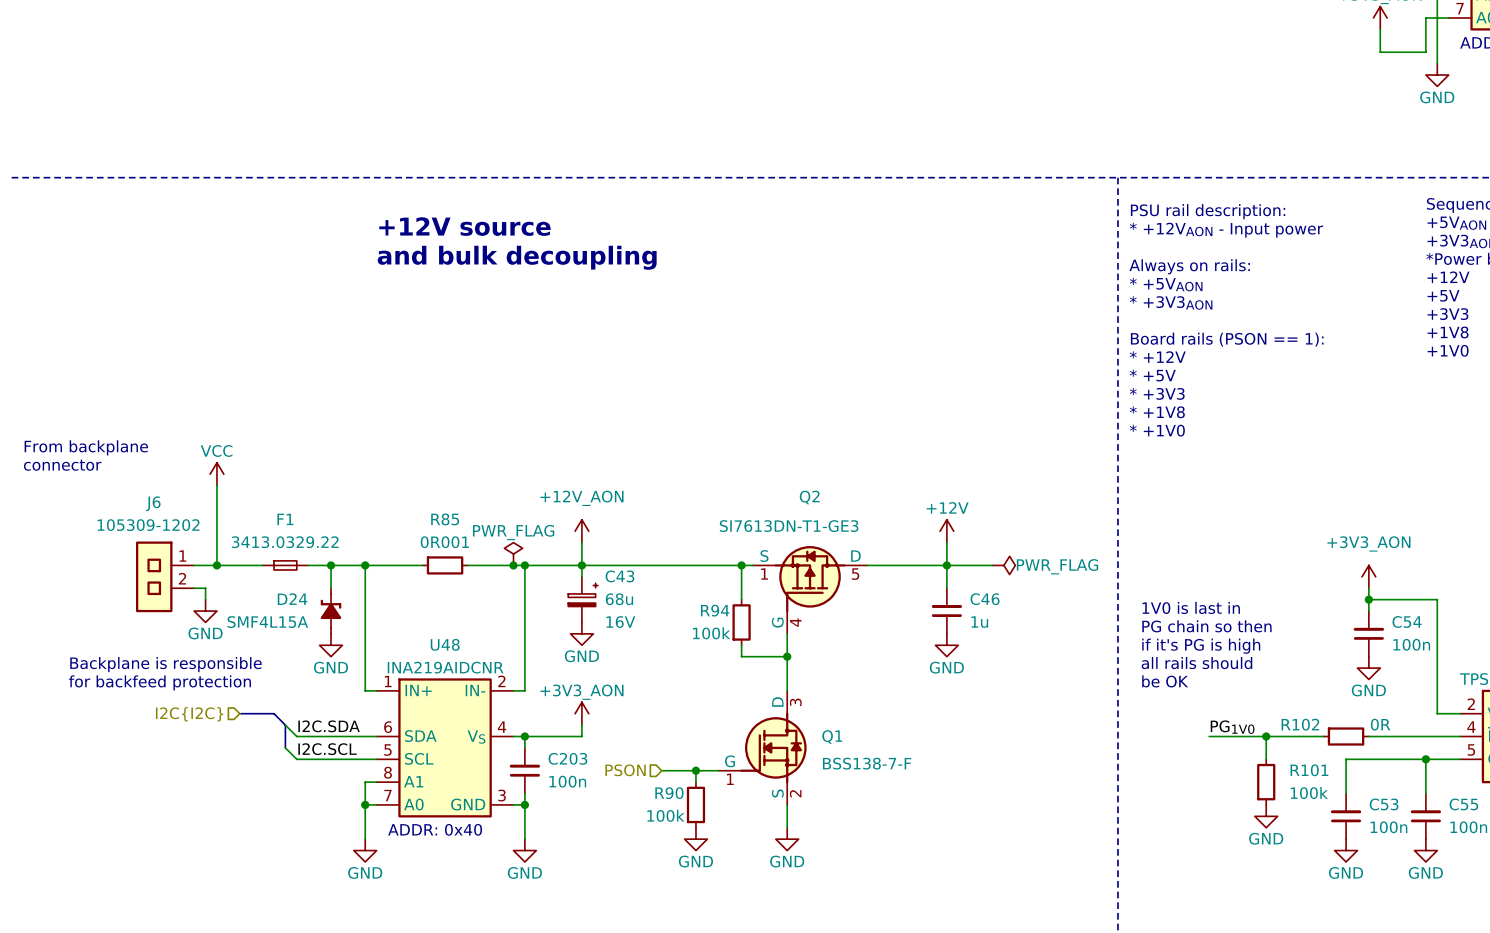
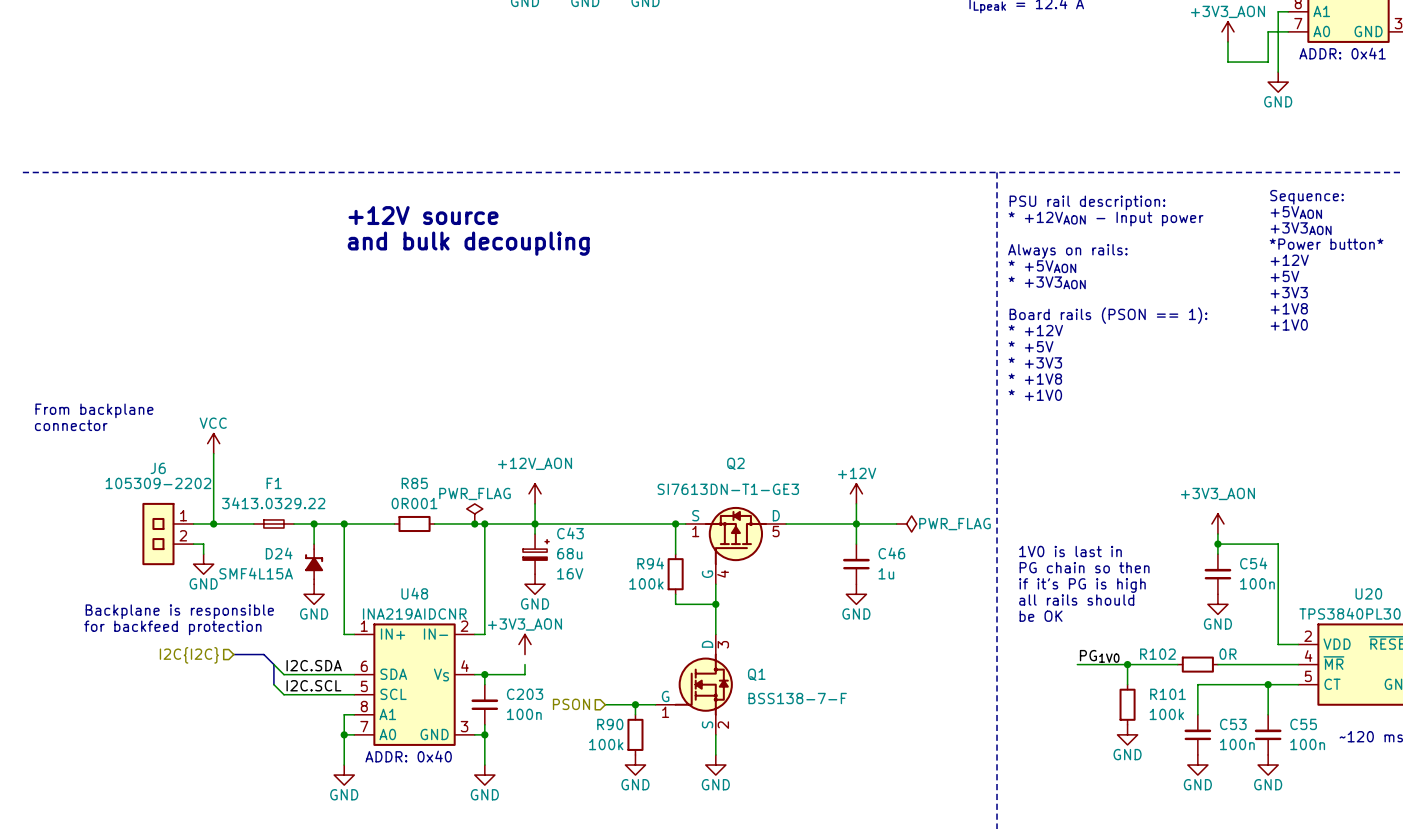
power symbol position: VCC (216, 474) -> VCC (213, 443)
wire: (216, 485) (216, 565) -> (213, 453) (213, 523)
J6 text: 105309-1202 (148, 525) -> 105309-2202 (158, 483)
power symbol position: +12V_AON (581, 531) -> +12V_AON (535, 493)
power symbol position: +12V (946, 531) -> +12V (856, 493)
wire: (581, 542) (581, 576) -> (535, 503) (535, 534)
wire: (946, 542) (946, 588) -> (856, 503) (856, 544)
power symbol position: PWR_FLAG (513, 554) -> PWR_FLAG (474, 513)
wire: (194, 565) (262, 565) -> (193, 523) (253, 523)
junction position: (216, 565) -> (213, 523)
F1 position: (285, 565) -> (273, 523)
wire: (308, 565) (422, 565) -> (294, 523) (394, 523)
wire: (331, 565) (331, 588) -> (314, 523) (314, 544)
junction: (331, 565) -> none
wire: (365, 565) (365, 690) (376, 690) -> (344, 523) (344, 634) (354, 634)
junction: (365, 565) -> none
R85 position: (445, 565) -> (414, 523)
wire: (467, 565) (753, 565) -> (434, 523) (685, 523)
junction: (513, 565) -> none
wire: (524, 565) (524, 690) (513, 690) -> (484, 523) (484, 634) (474, 634)
junction: (524, 565) -> none
junction position: (581, 565) -> (535, 523)
wire: (741, 565) (741, 599) -> (675, 523) (675, 554)
junction position: (741, 565) -> (675, 523)
wire: (867, 565) (992, 565) -> (786, 523) (896, 523)
junction position: (946, 565) -> (856, 523)
power symbol position: PWR_FLAG (1003, 565) -> PWR_FLAG (906, 523)
J6 position: (165, 576) -> (167, 534)
junction: none -> (314, 523)
junction: none -> (344, 523)
junction: none -> (474, 523)
junction: none -> (484, 523)
wire: (194, 588) (205, 588) (205, 599) -> (203, 554) (203, 544) (193, 544)
Q2 position: (810, 589) -> (735, 545)
C43 position: (583, 599) -> (536, 554)
power symbol position: GND (205, 611) -> GND (203, 564)
D24 position: (331, 611) -> (314, 564)
C46 position: (946, 611) -> (856, 564)
R94 position: (741, 622) -> (675, 574)
power symbol position: GND (581, 633) -> GND (535, 584)
wire: (787, 633) (787, 690) -> (715, 584) (715, 634)
power symbol position: GND (331, 645) -> GND (314, 594)
wire: (741, 645) (741, 656) (787, 656) -> (675, 594) (675, 604) (715, 604)
power symbol position: GND (946, 645) -> GND (856, 594)
junction position: (787, 656) -> (715, 604)
text position: Backplane is responsible (165, 664) -> Backplane is responsible (179, 611)
text position: for backfeed protection (160, 682) -> for backfeed protection (172, 627)
bus: (239, 713) (273, 713) (285, 725) (285, 747) -> (233, 654) (263, 654) (273, 664) (273, 684)
hierarchical label position: I2C{I2C} (189, 714) -> I2C{I2C} (189, 655)
wire: (285, 725) (296, 736) (376, 736) -> (273, 664) (283, 674) (354, 674)
wire: (581, 725) (581, 736) (513, 736) -> none
label position: I2C.SDA (329, 726) -> I2C.SDA (314, 665)
wire: (524, 736) (524, 747) -> (525, 664) (525, 674) (474, 674)
junction position: (524, 736) -> (484, 674)
wire: (285, 747) (296, 759) (376, 759) -> (273, 684) (283, 694) (354, 694)
U48 position: (445, 747) -> (414, 684)
wire: none -> (484, 674) (484, 684)
Q1 position: (762, 747) -> (694, 684)
label position: I2C.SCL (327, 749) -> I2C.SCL (313, 685)
C203 position: (524, 770) -> (484, 704)
hierarchical label position: PSON (625, 770) -> PSON (571, 704)
wire: (661, 770) (718, 770) -> (605, 704) (655, 704)
wire: (695, 770) (695, 782) -> (635, 704) (635, 714)
junction position: (695, 770) -> (635, 704)
wire: (376, 782) (365, 782) (365, 839) -> (354, 714) (344, 714) (344, 765)
wire: (524, 793) (524, 839) -> (484, 724) (484, 765)
wire: (365, 804) (376, 804) -> (344, 734) (354, 734)
junction position: (365, 804) -> (344, 734)
wire: (513, 804) (524, 804) -> (474, 734) (484, 734)
junction position: (524, 804) -> (484, 734)
R90 position: (695, 804) -> (635, 734)
wire: (787, 804) (787, 827) -> (715, 734) (715, 754)
text position: ADDR: 0x40 (435, 829) -> ADDR: 0x40 (408, 756)
power symbol position: GND (695, 839) -> GND (635, 765)
power symbol position: GND (787, 839) -> GND (715, 765)
power symbol position: GND (365, 850) -> GND (344, 775)
power symbol position: GND (524, 850) -> GND (484, 775)

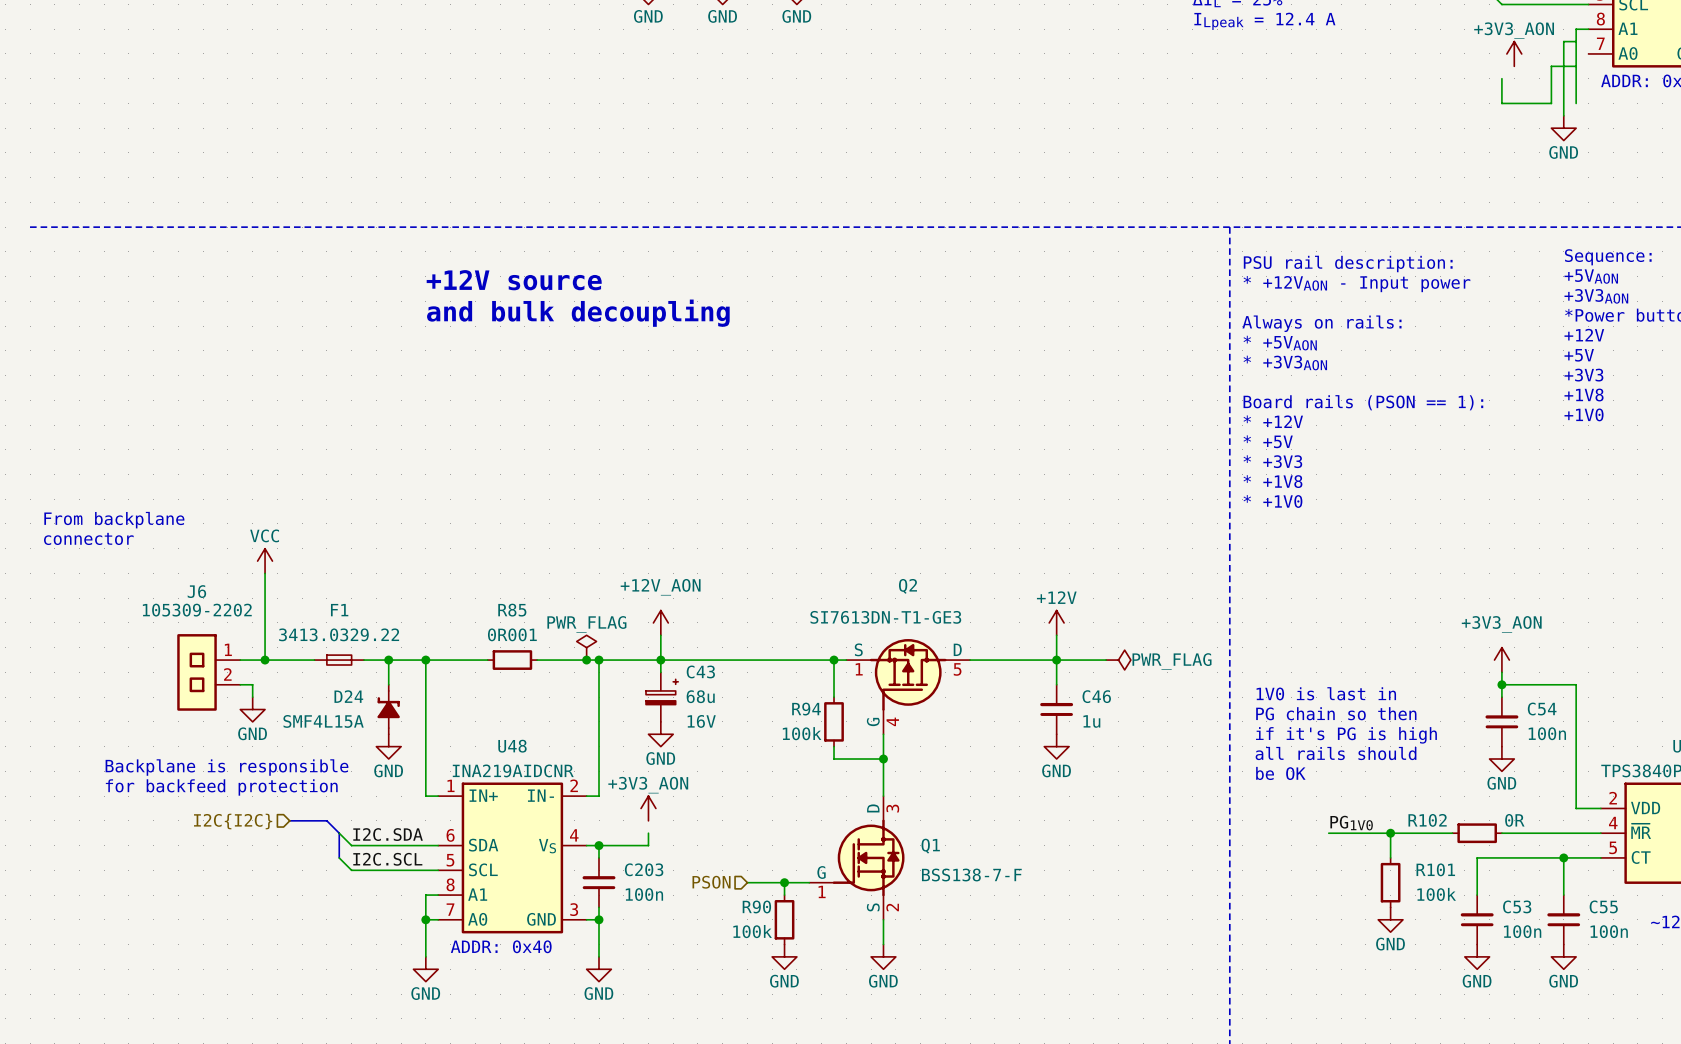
wire: (1268, 31) (1288, 31) -> (1563, 53) (1563, 41) (1576, 41)
wire: (1227, 41) (1227, 62) (1268, 62) -> (1563, 115) (1563, 91)
wire: none -> (1576, 66) (1551, 66) (1551, 103) (1501, 103) (1501, 78)
power symbol position: GND (1278, 82) -> GND (1563, 128)

